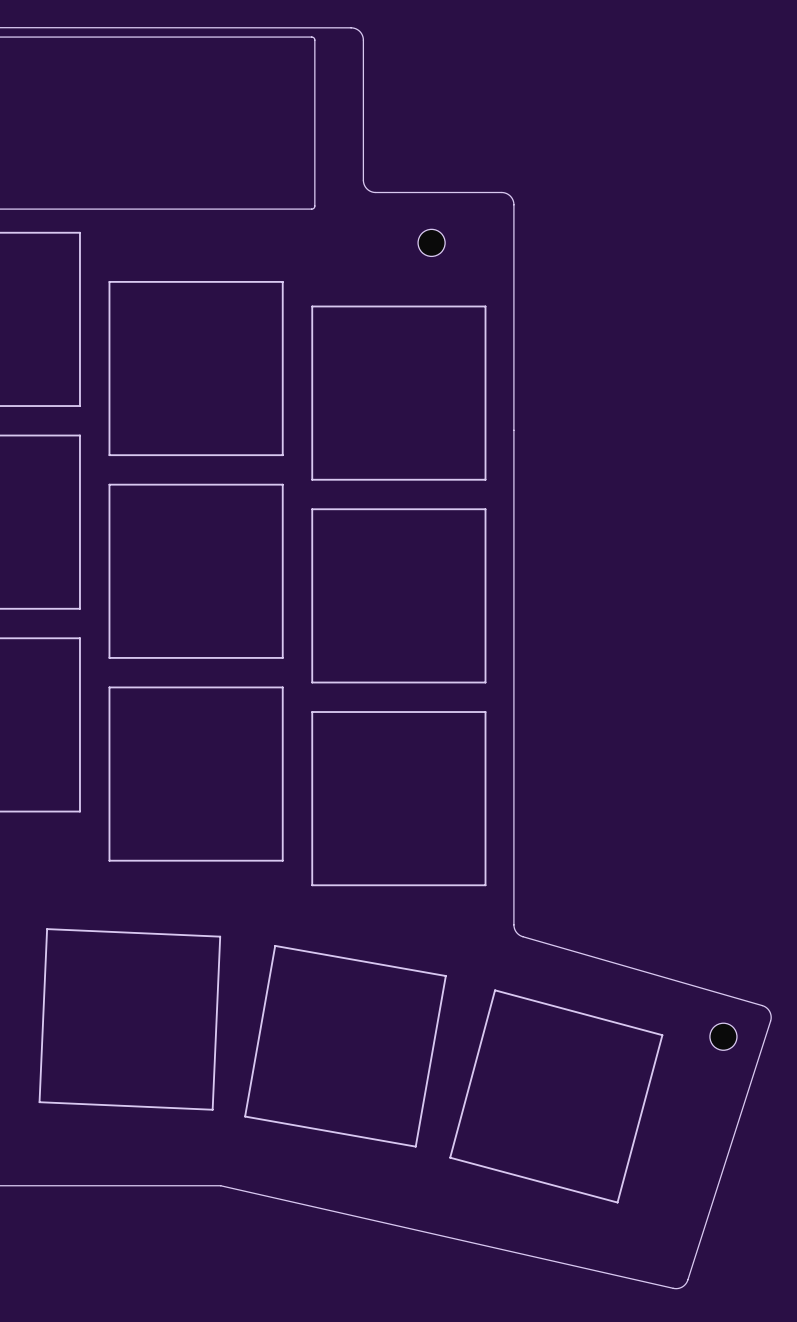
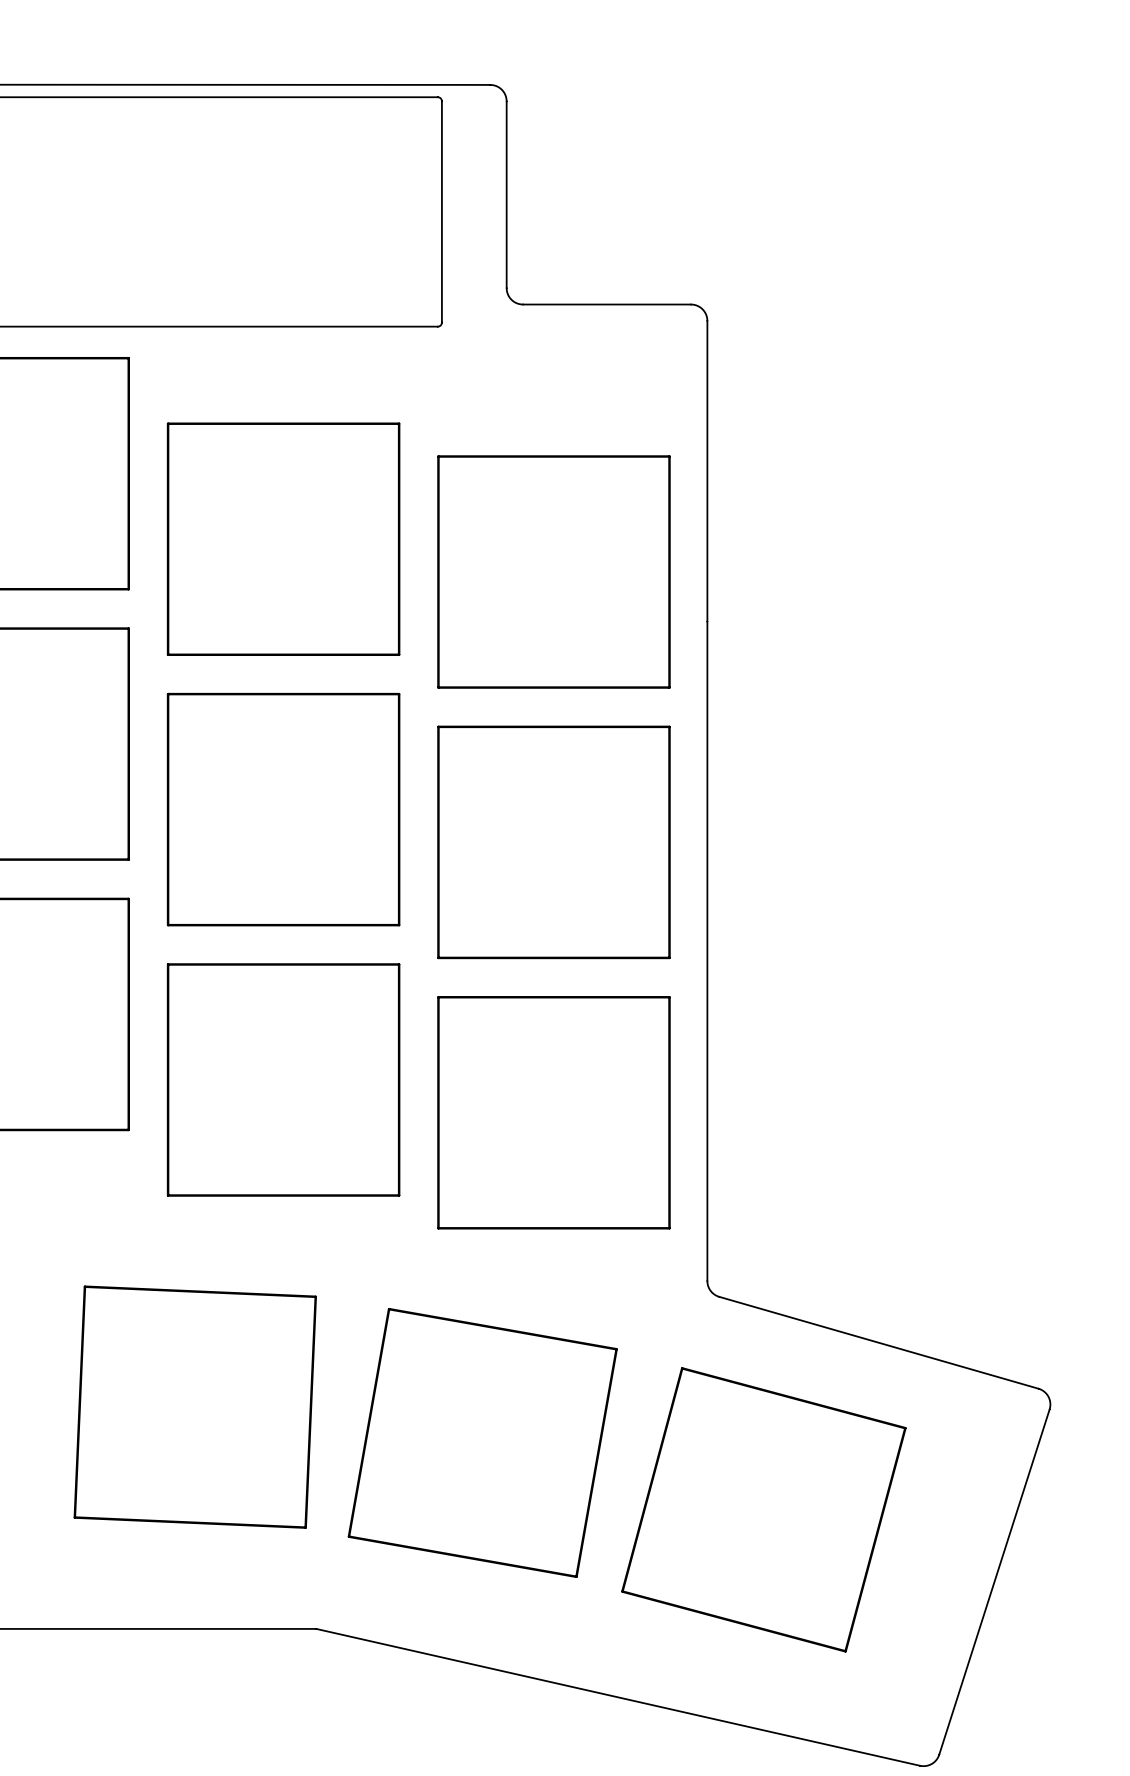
part: (431, 242) -> none
part: (723, 1036) -> none

